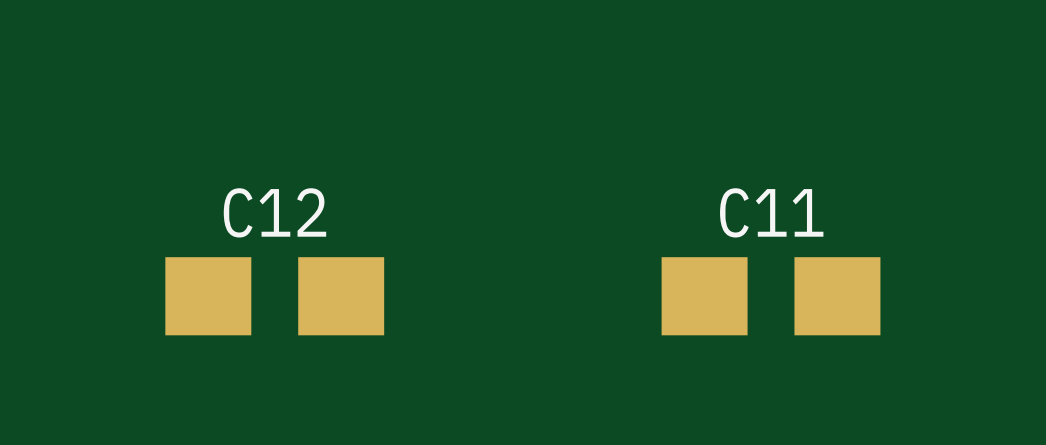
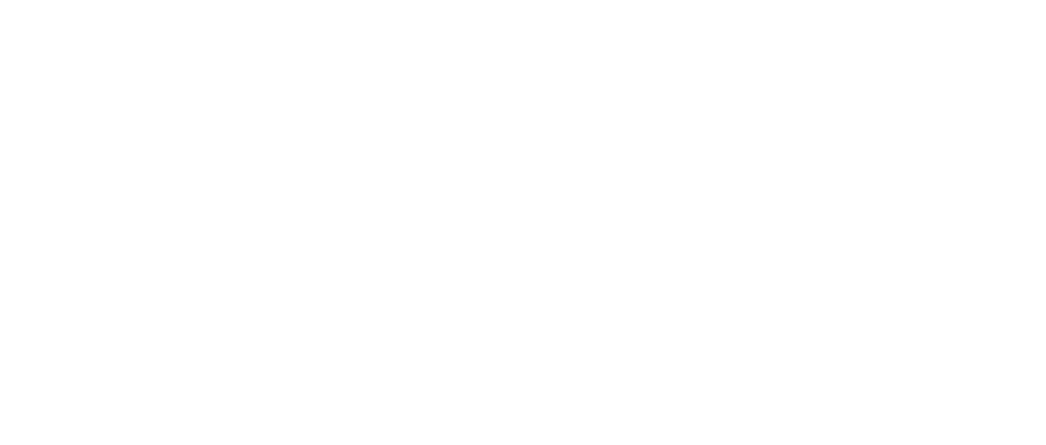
C12: (274, 296) -> none
C11: (771, 296) -> none

